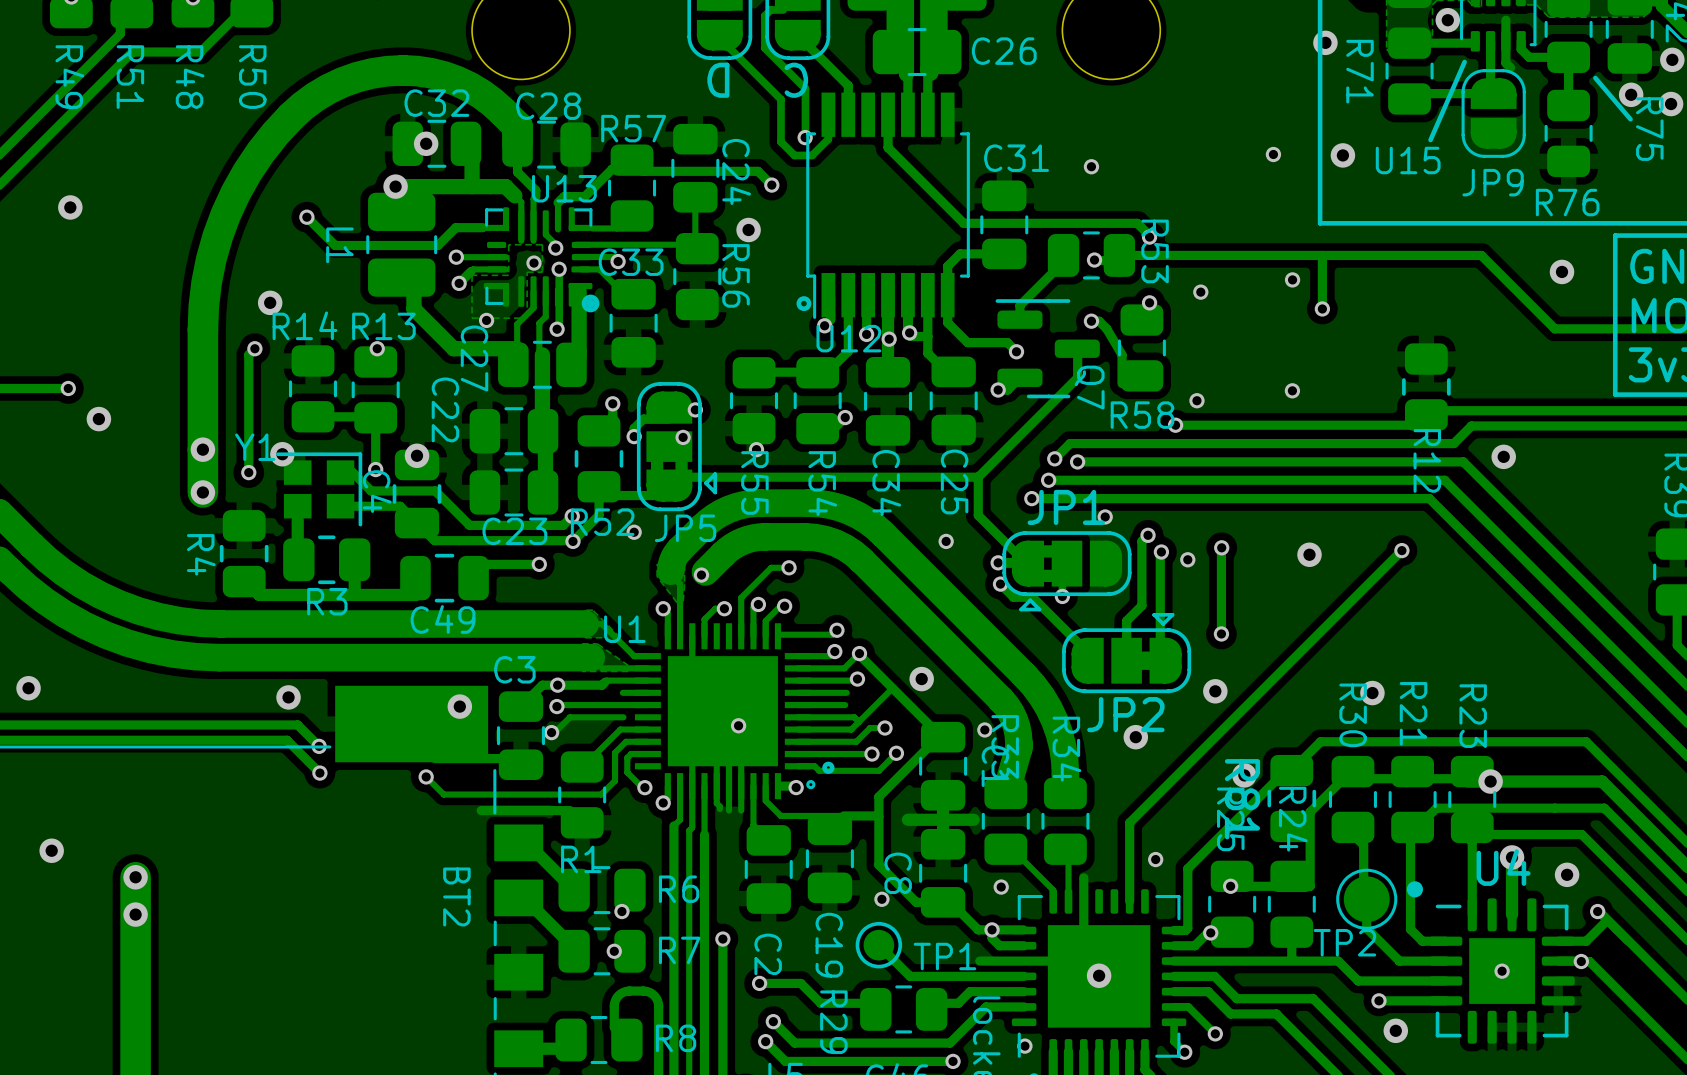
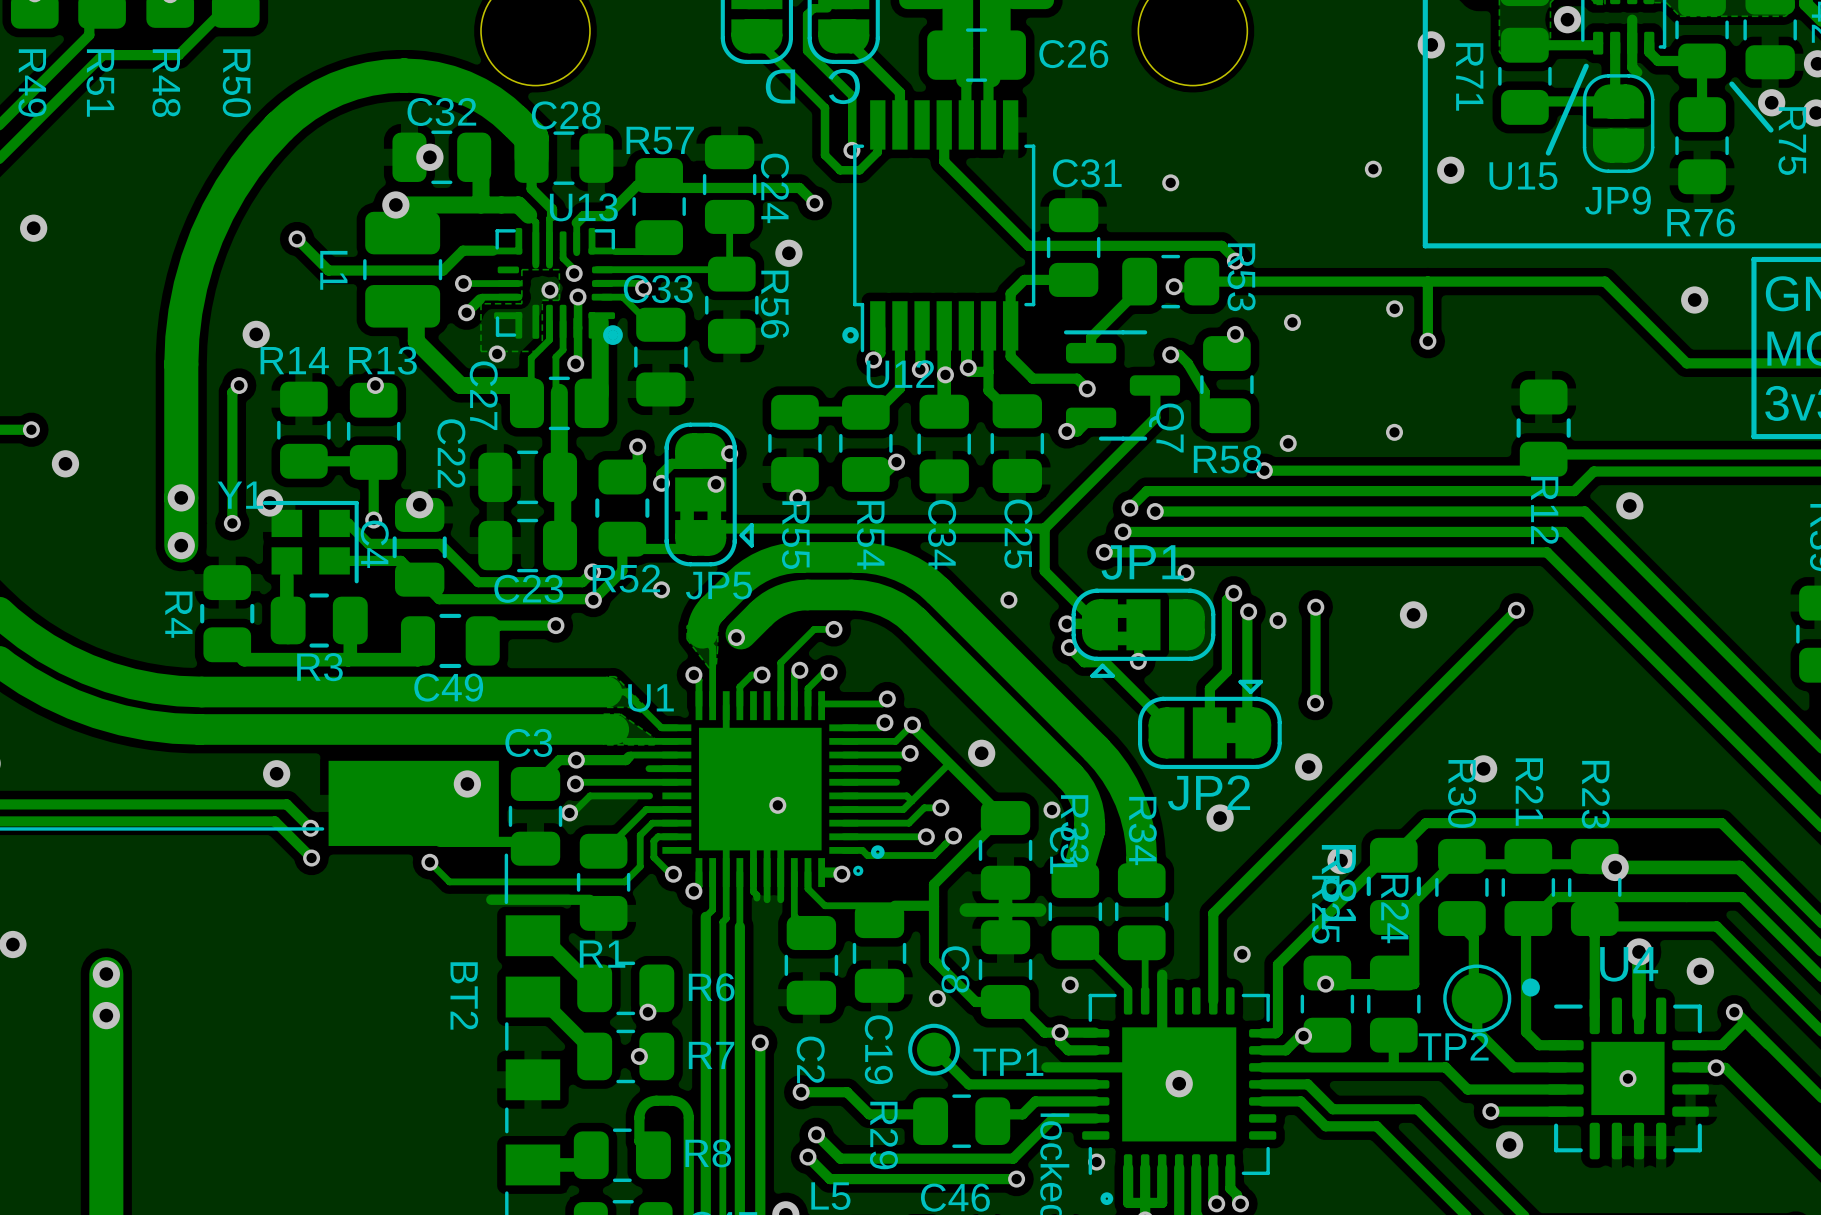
track: (1174, 1006) (1188, 1006) (1215, 1033) -> none
track: (1174, 1022) (1174, 1041) (1184, 1052) -> none
via: (1215, 1033) -> none
via: (1184, 1052) -> none

